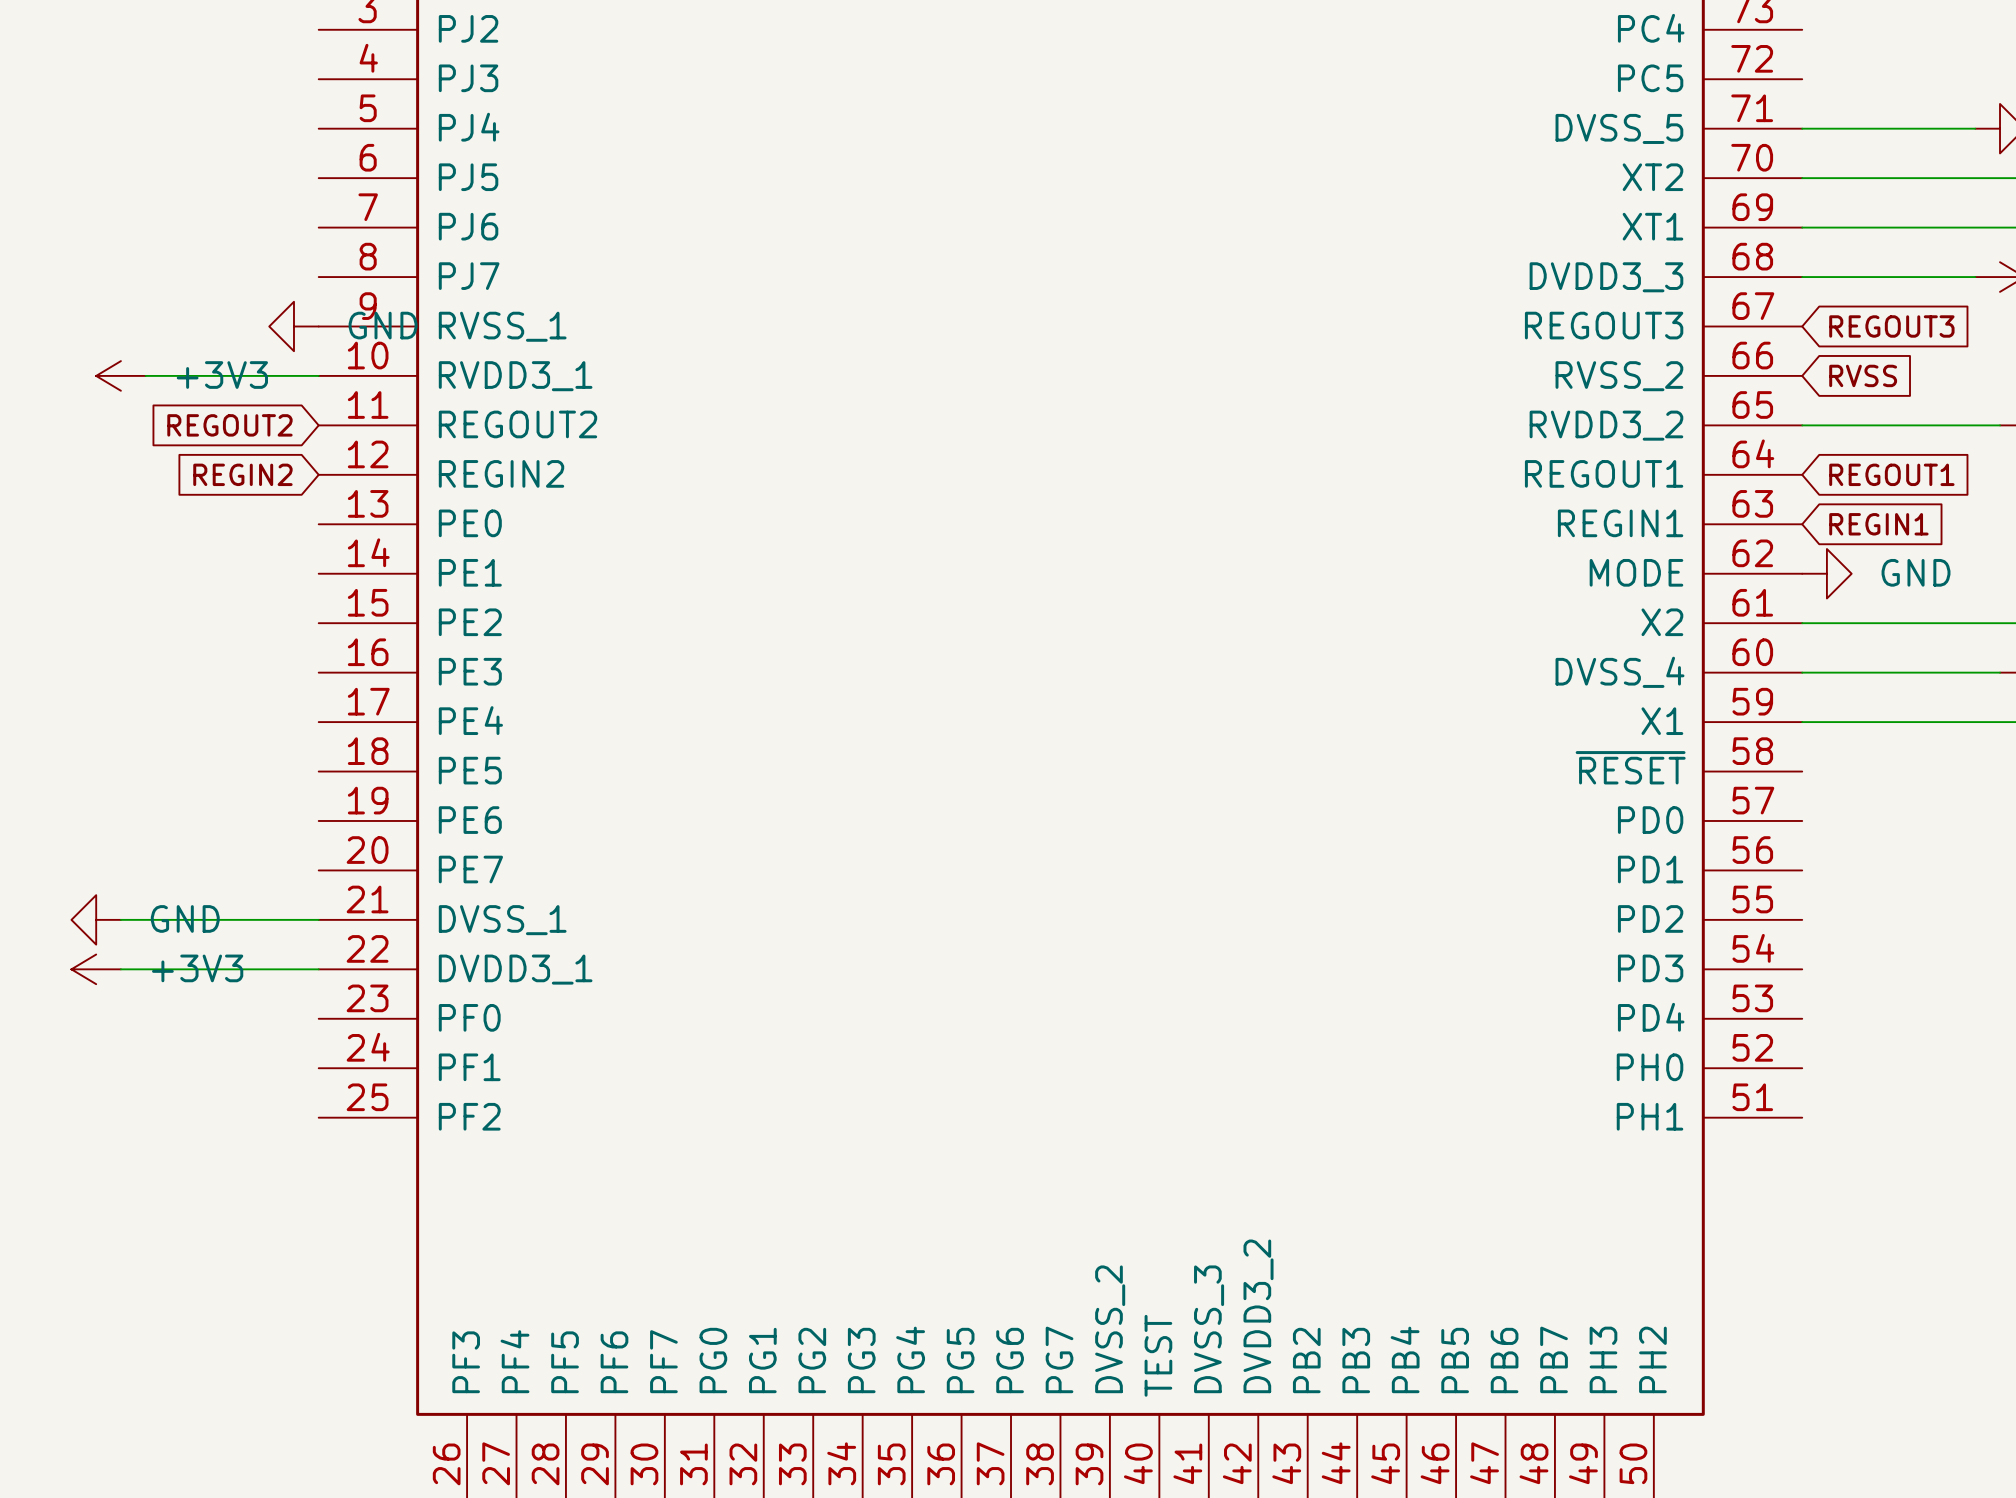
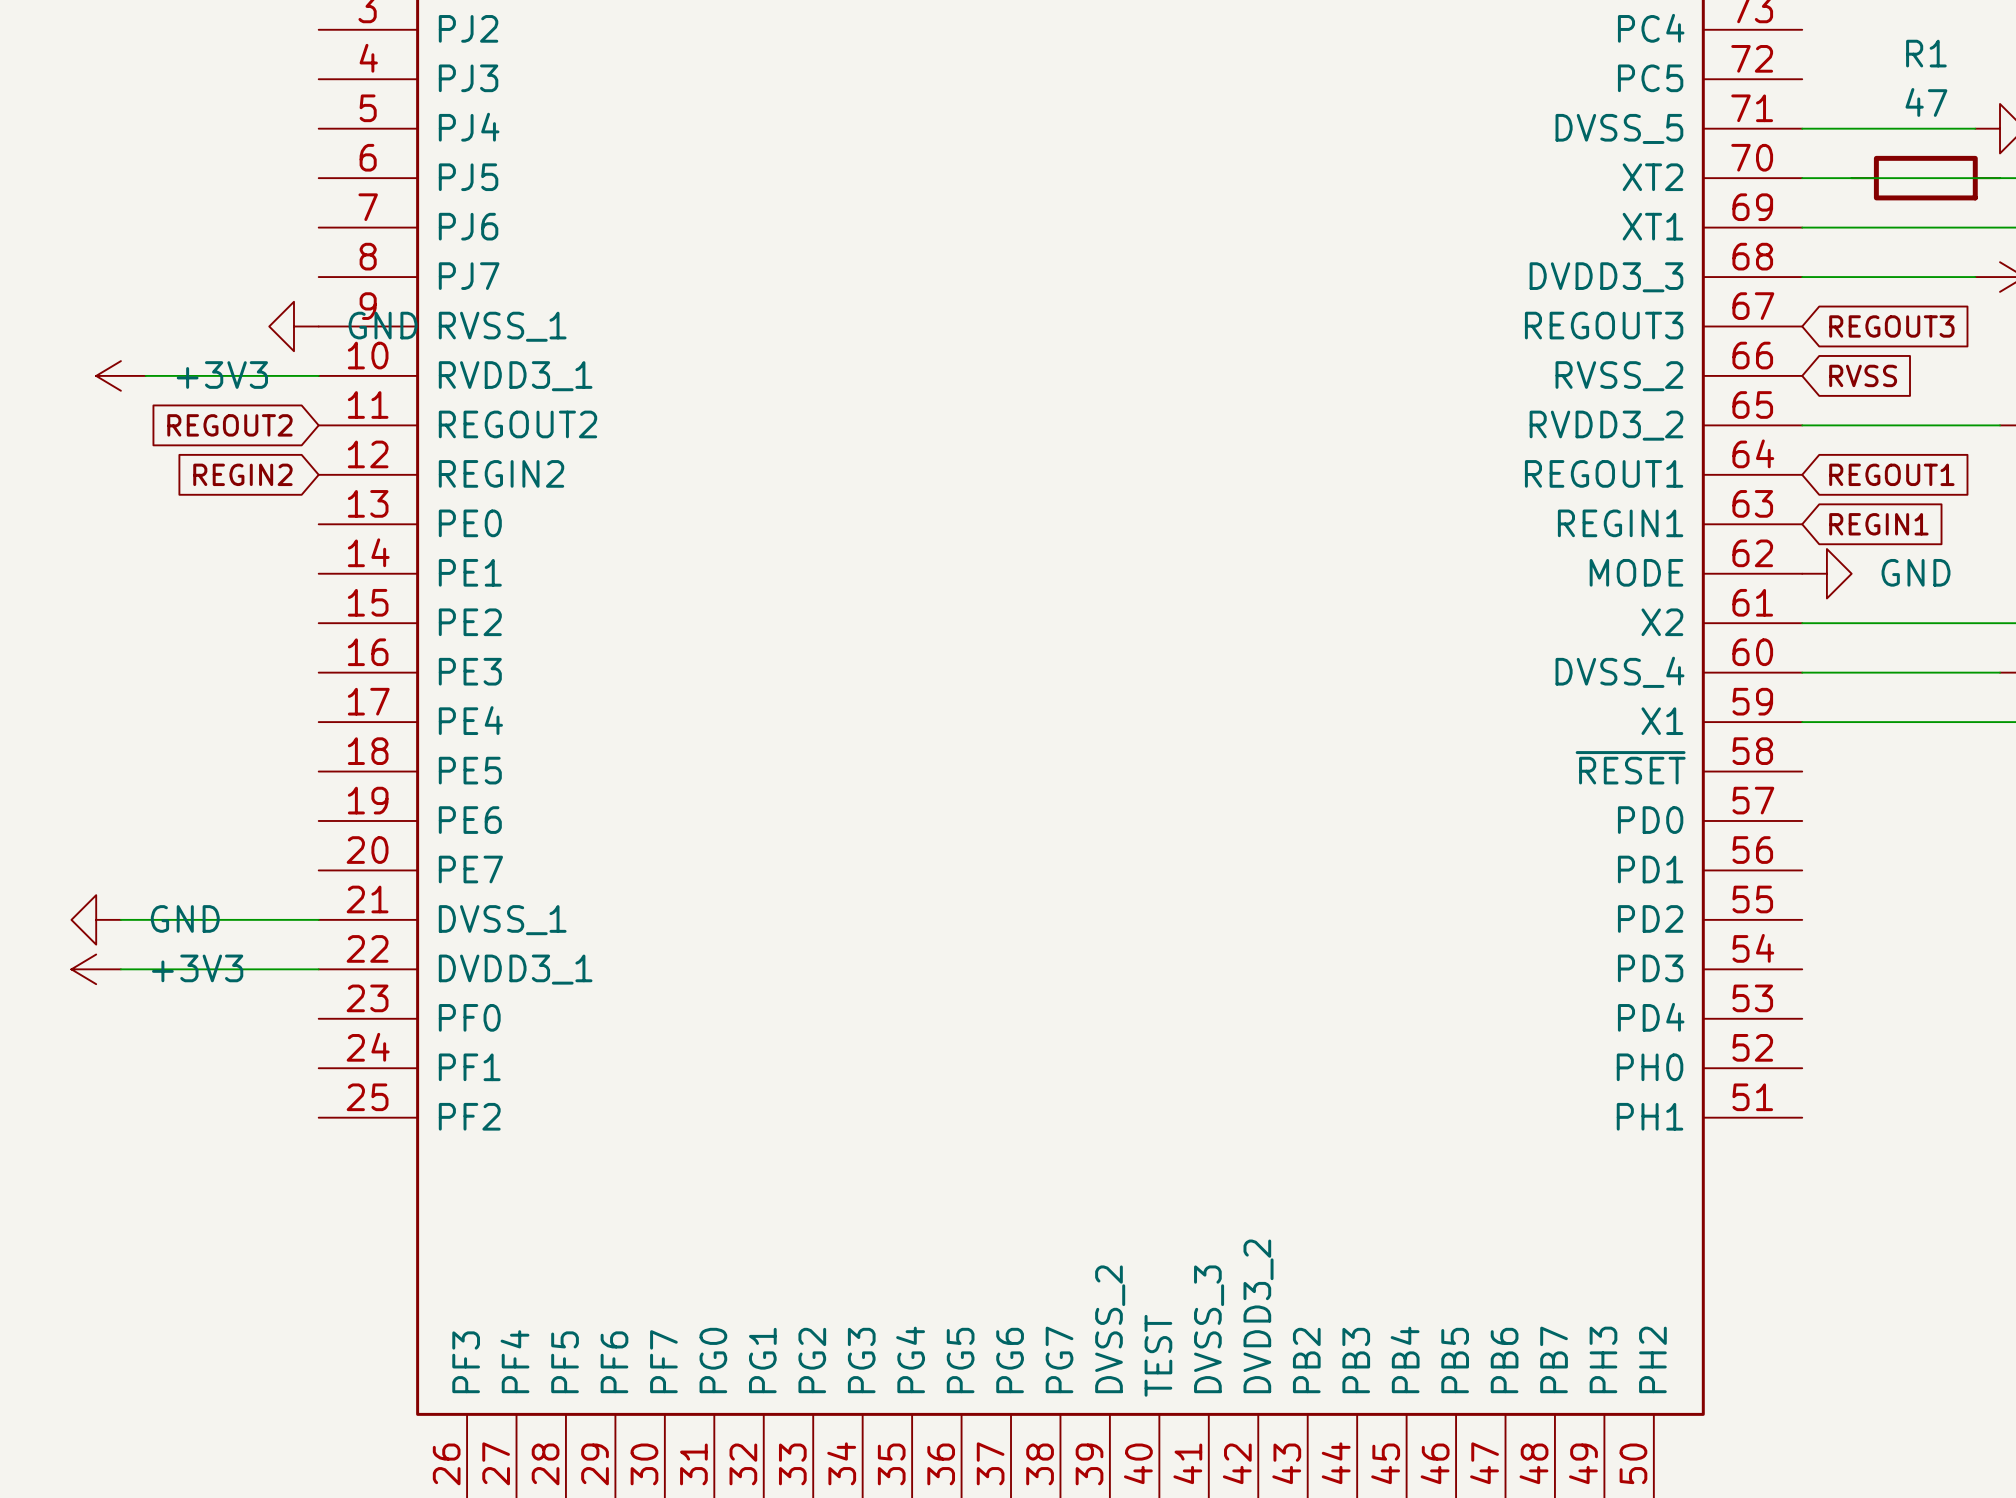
R1: none -> 47 (1925, 178)

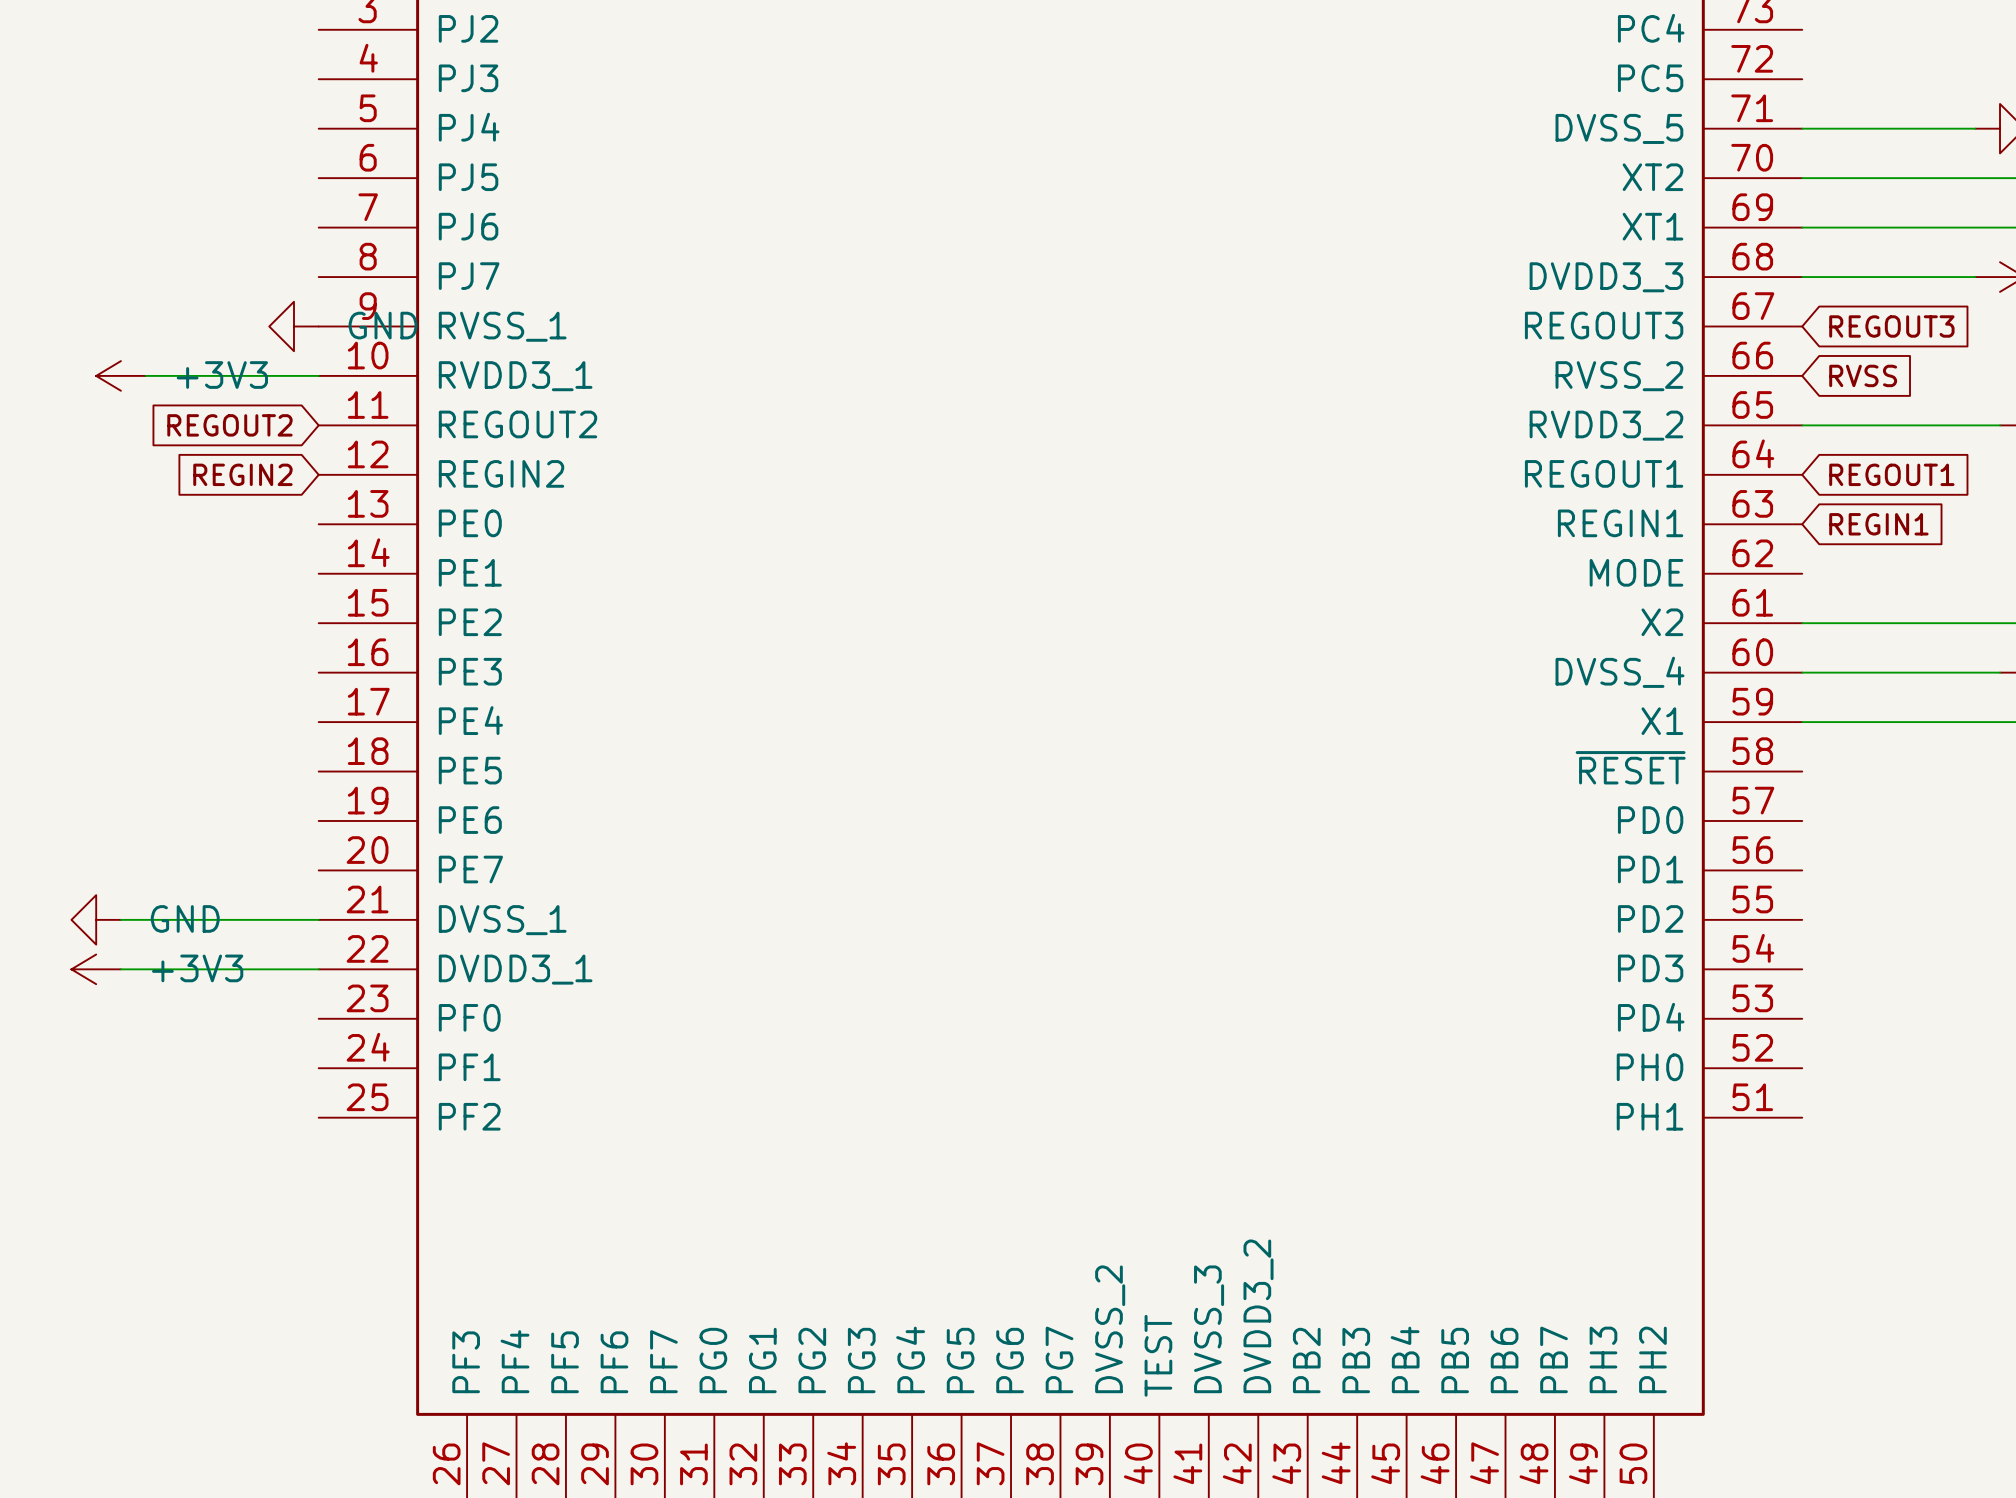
R1: 47 (1925, 178) -> none
power symbol: GND (1826, 573) -> none

